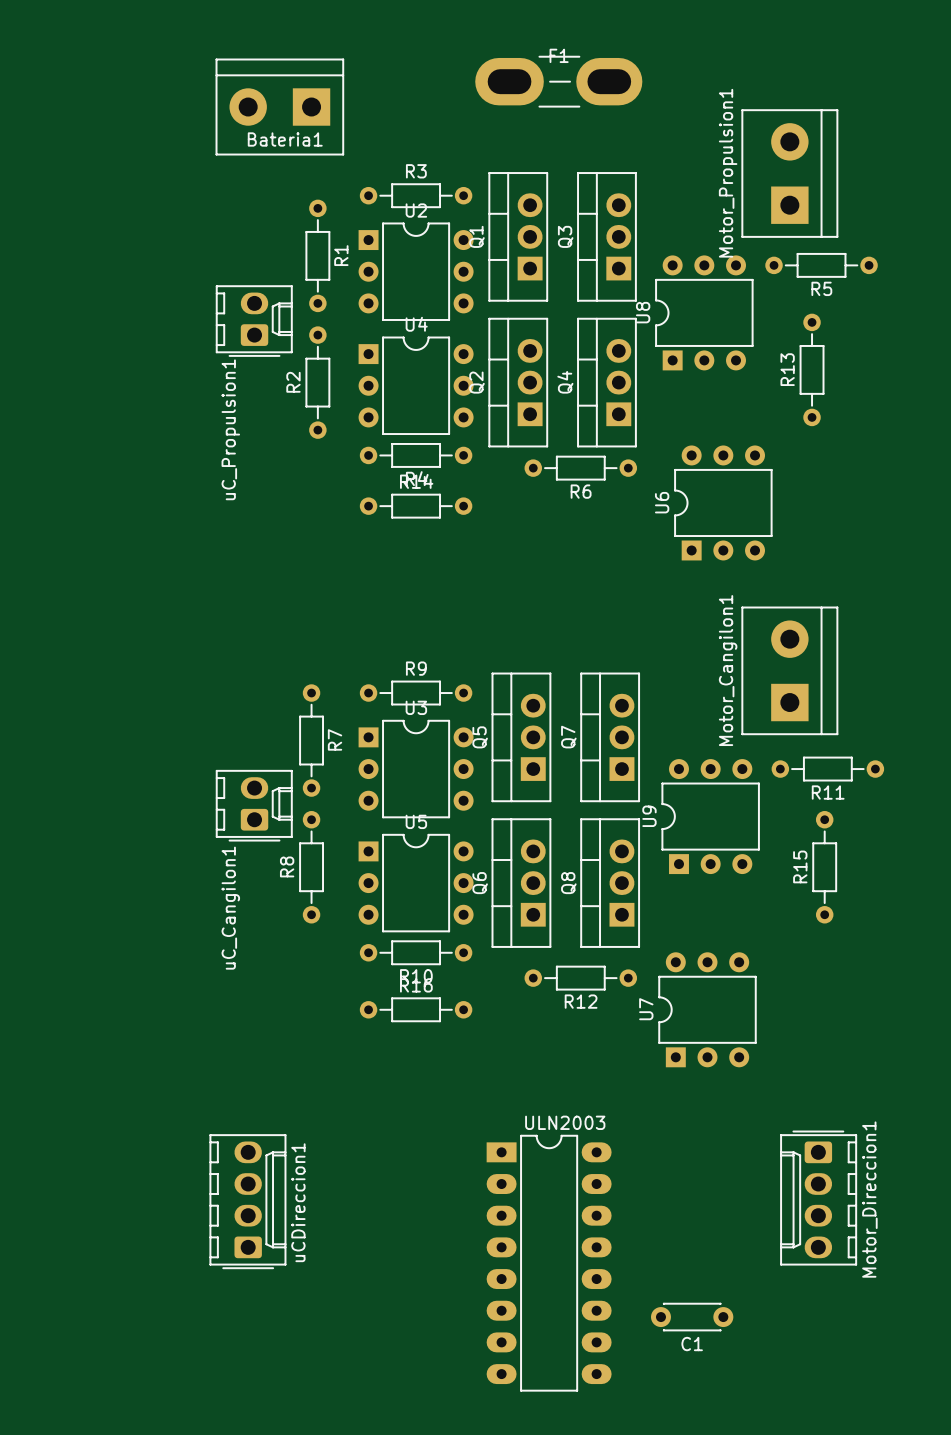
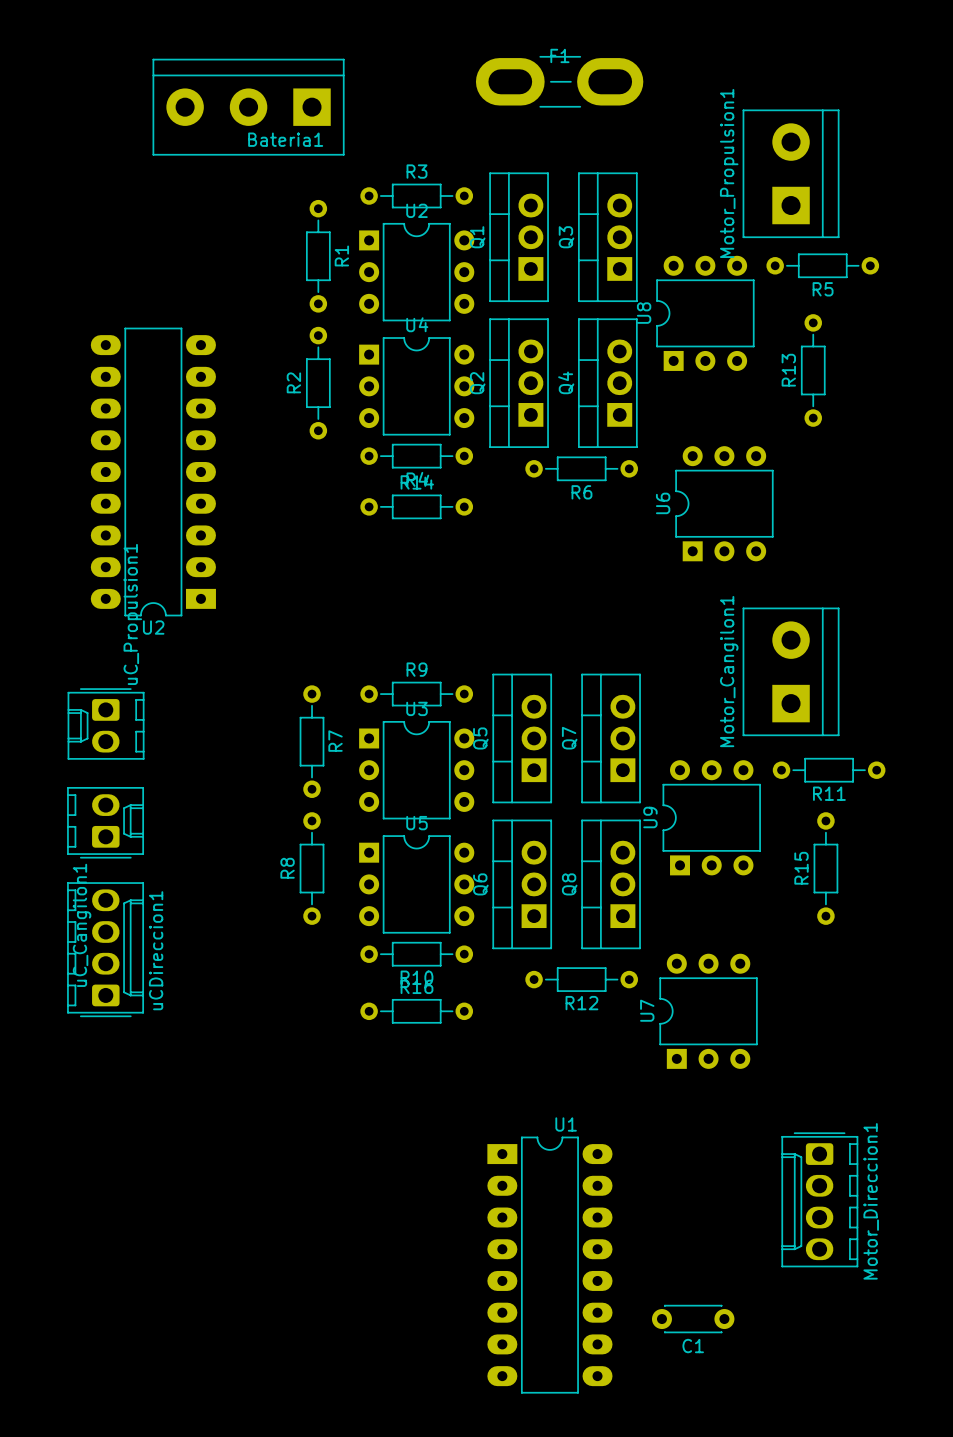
Bateria1 footprint: [215, 58, 344, 156] -> [152, 58, 345, 156]
uC_Propulsion1 rotation: 0° (254, 321) -> 180° (106, 723)
uC_Propulsion1 position: (254, 321) -> (106, 723)
U2: none -> (153, 471)
uC_Cangilon1 position: (254, 805) -> (105, 822)
ULN2003 name: ULN2003 (565, 1122) -> U1 (566, 1124)
uCDireccion1 position: (247, 1201) -> (105, 949)

